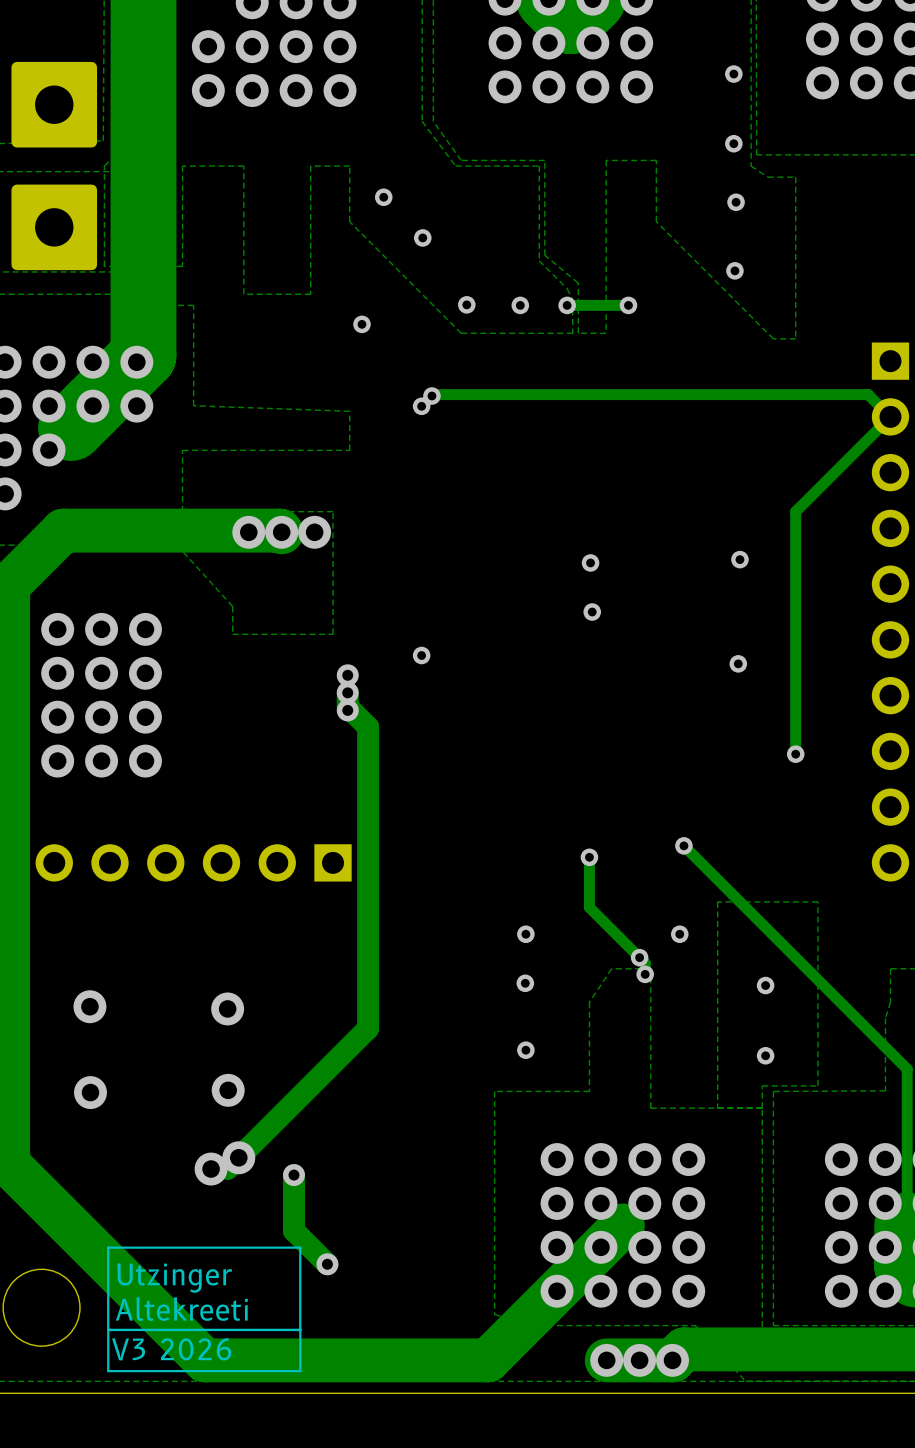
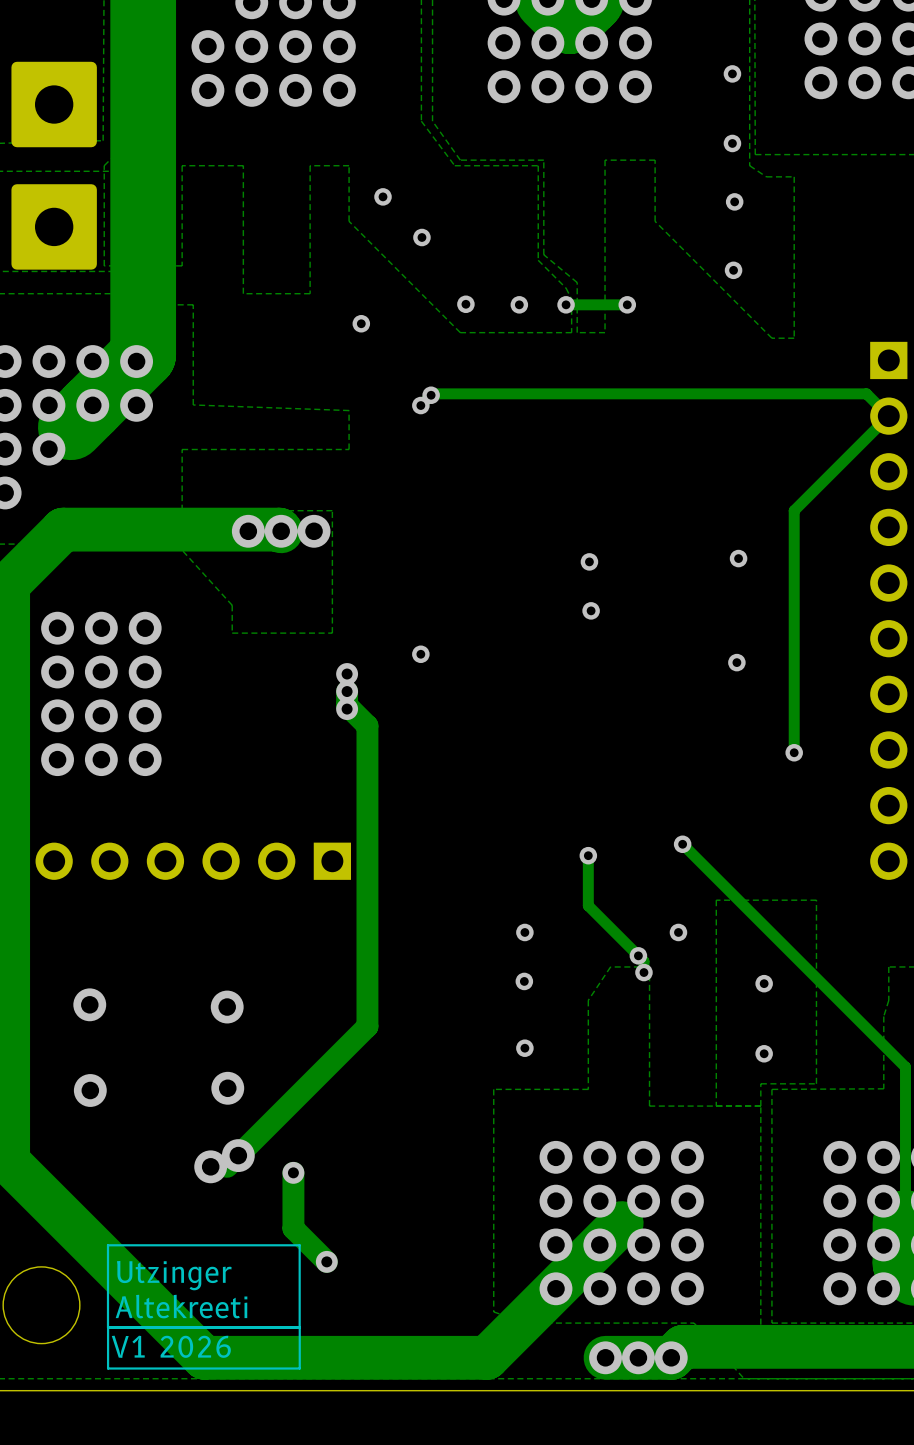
text: V3 2026 (171, 1349) -> V1 2026 (171, 1346)

